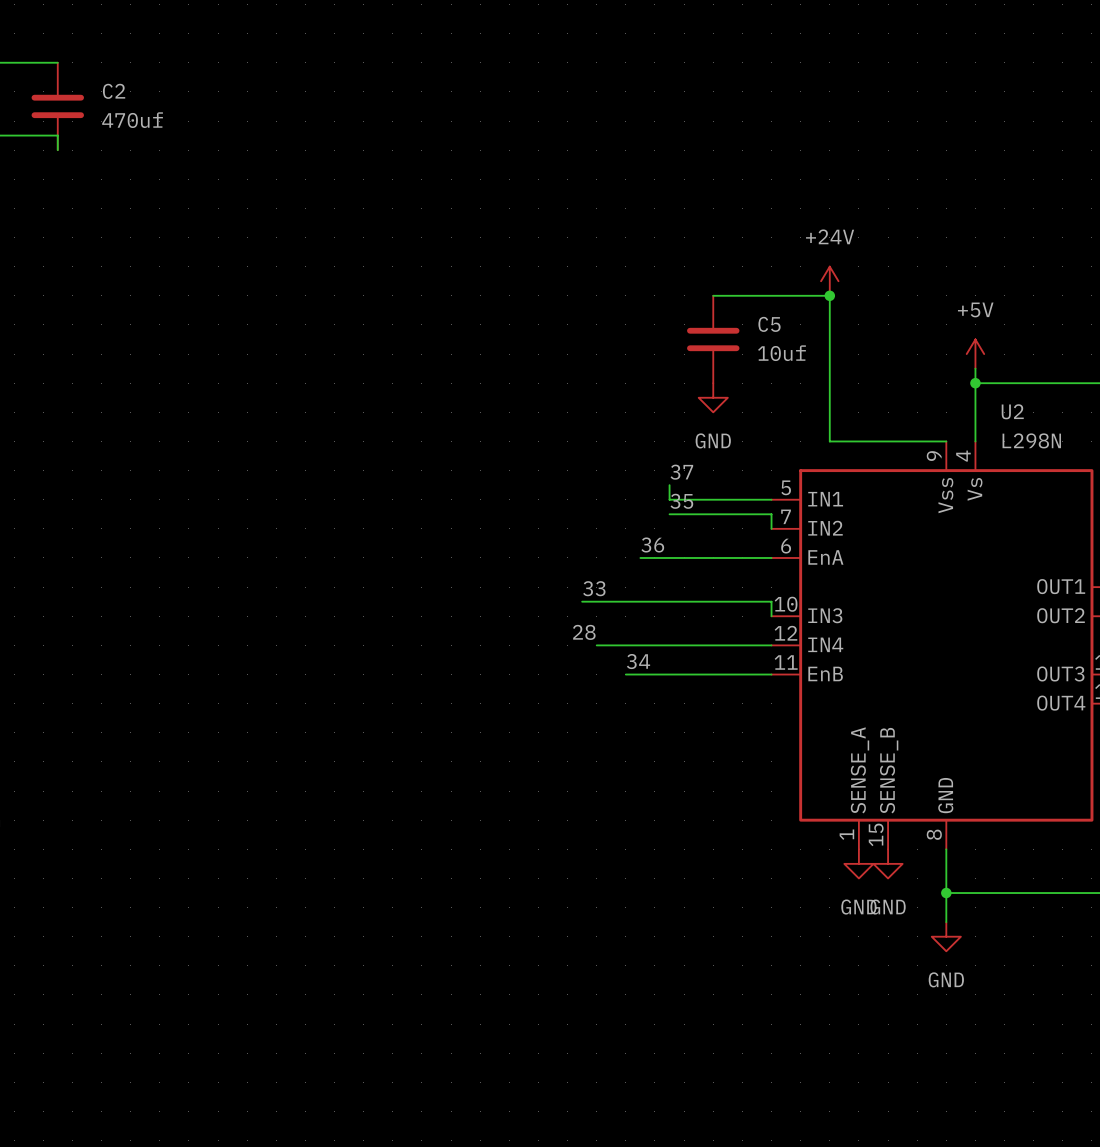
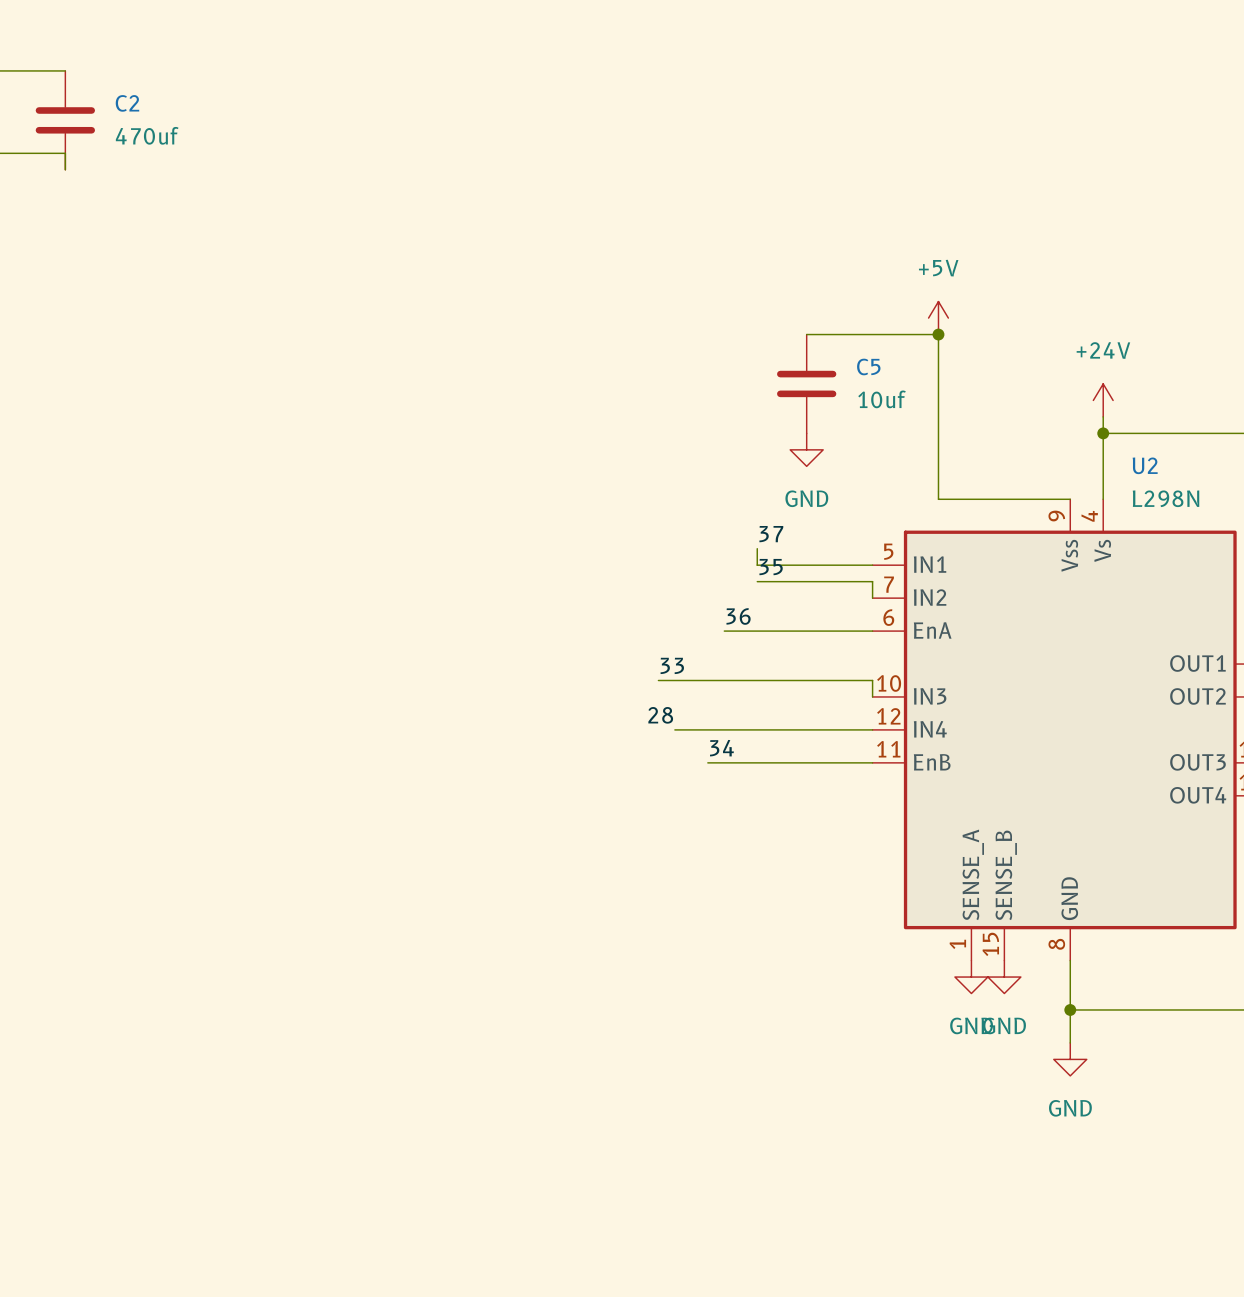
power symbol: +24V (829, 281) -> +5V (938, 318)
power symbol: +5V (975, 354) -> +24V (1103, 400)

